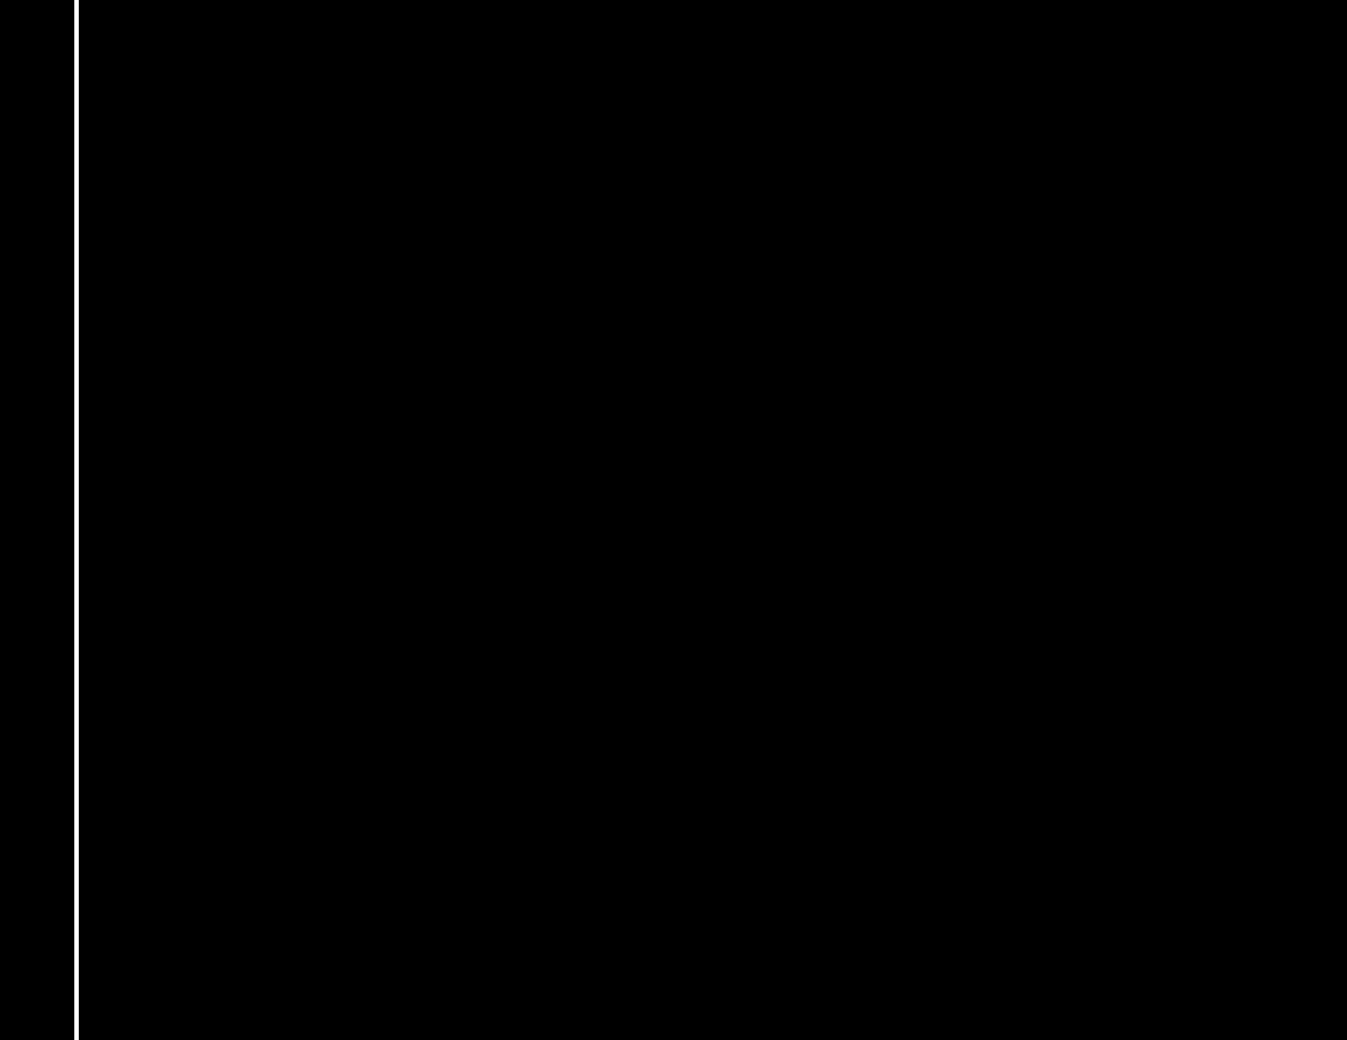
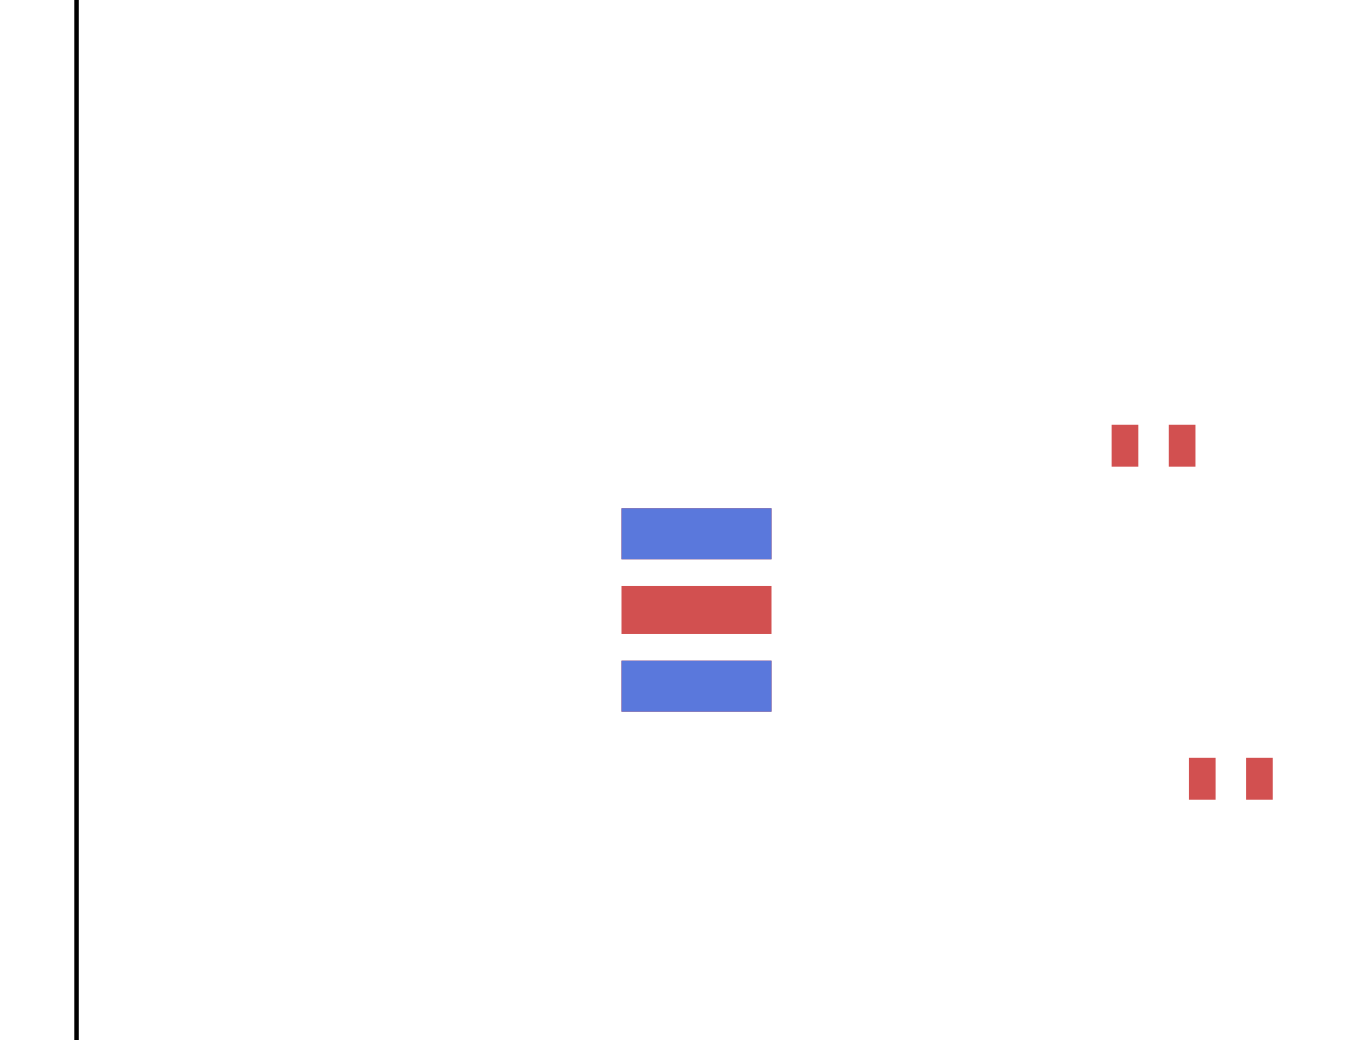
part: none -> (1153, 445)
part: none -> (696, 609)
part: none -> (1230, 778)

